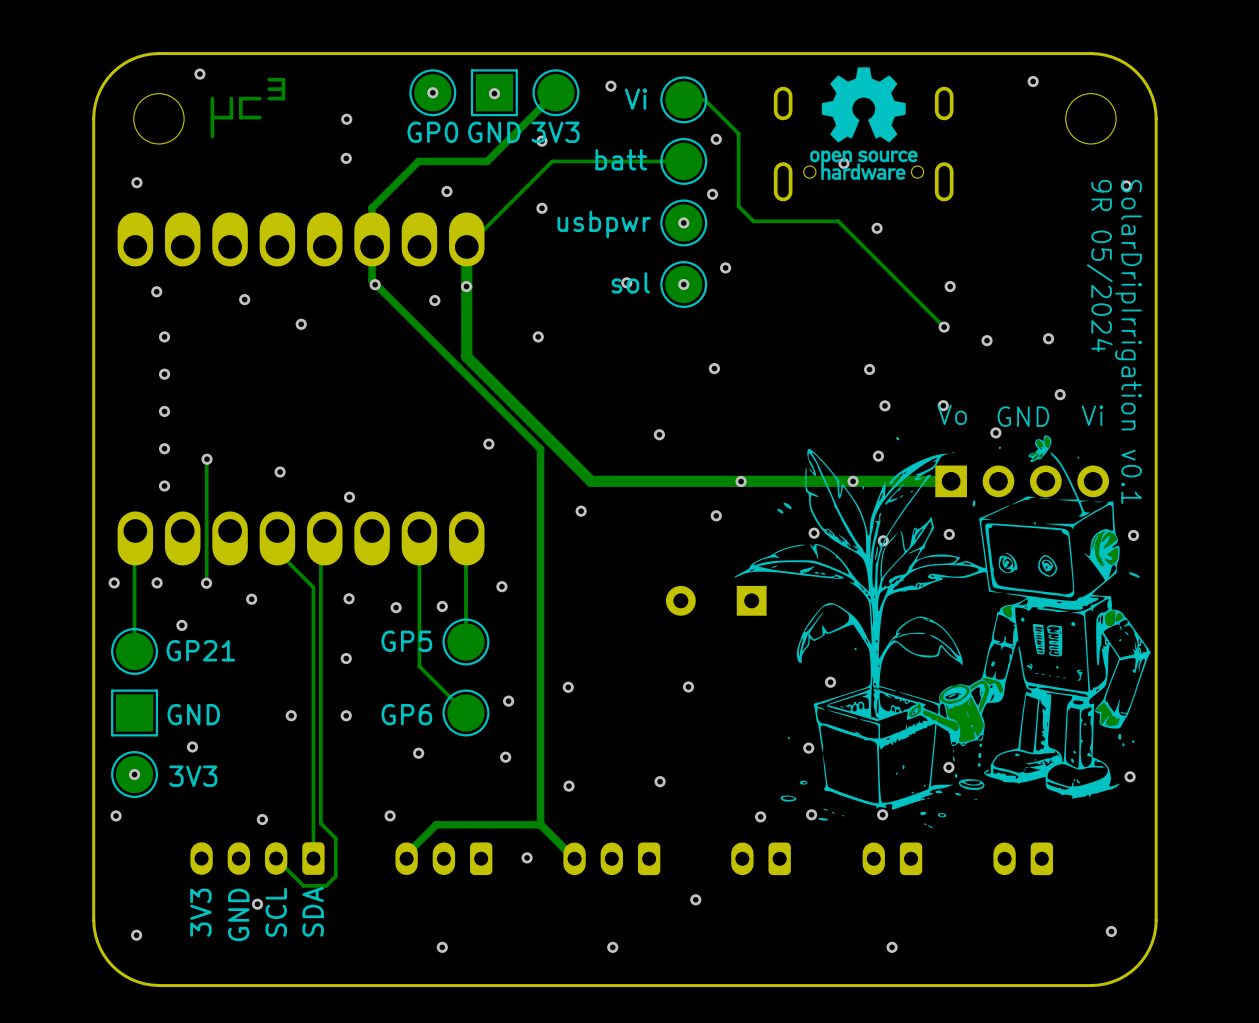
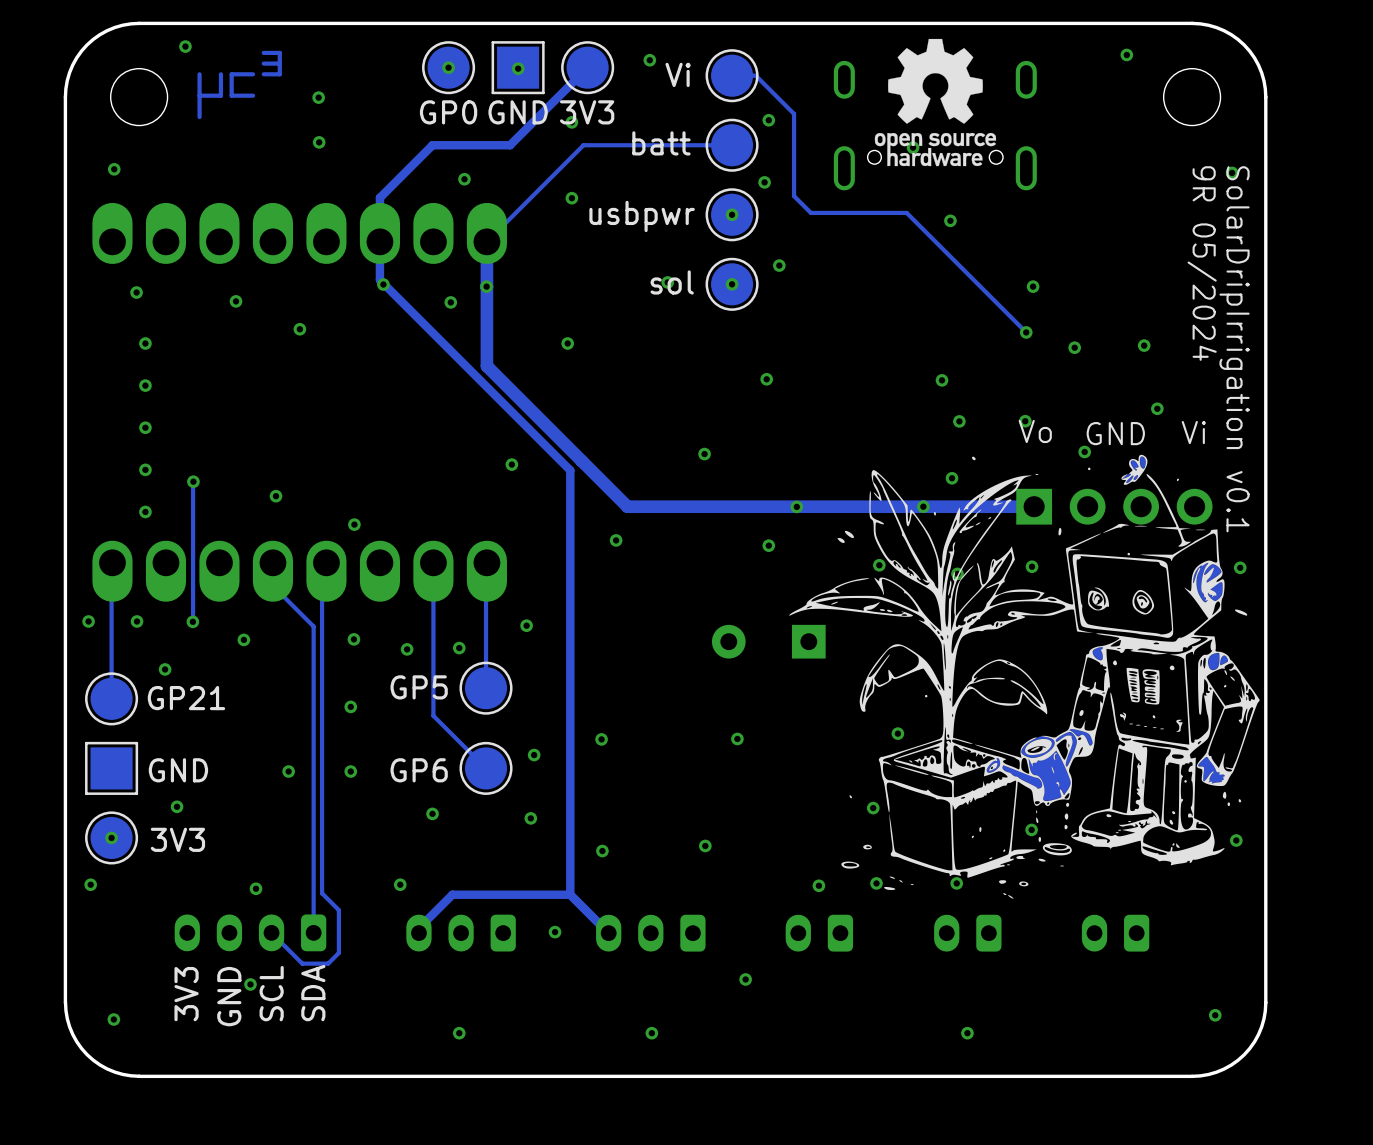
via: none -> (318, 97)
via: (346, 119) -> none
via: none -> (319, 142)
via: (346, 158) -> none

